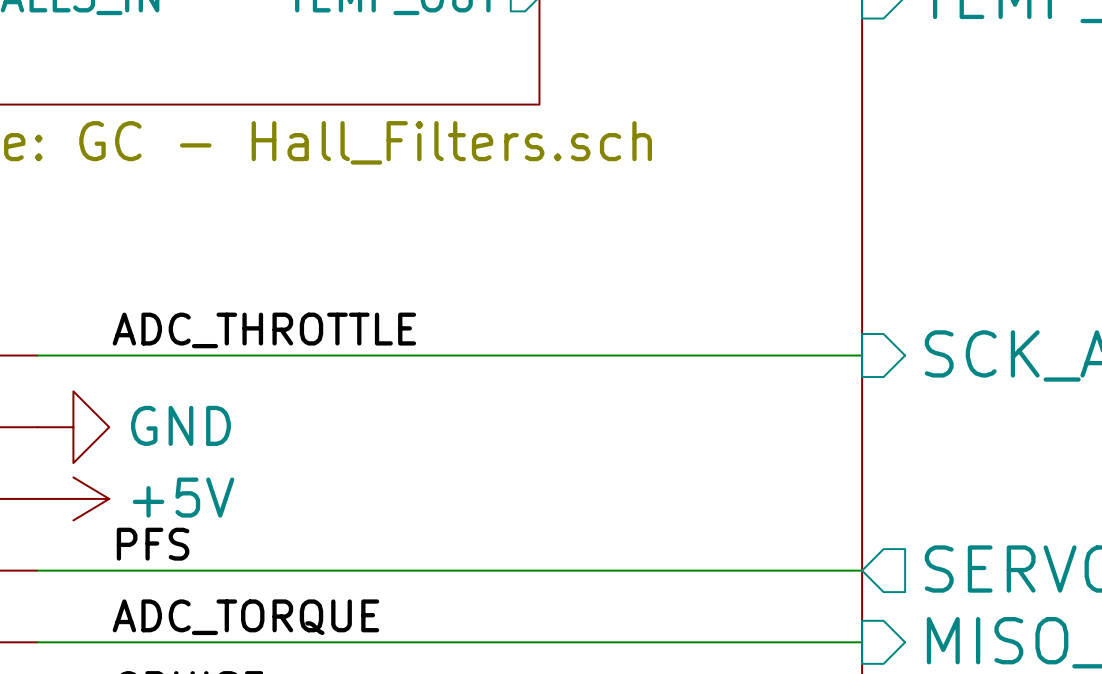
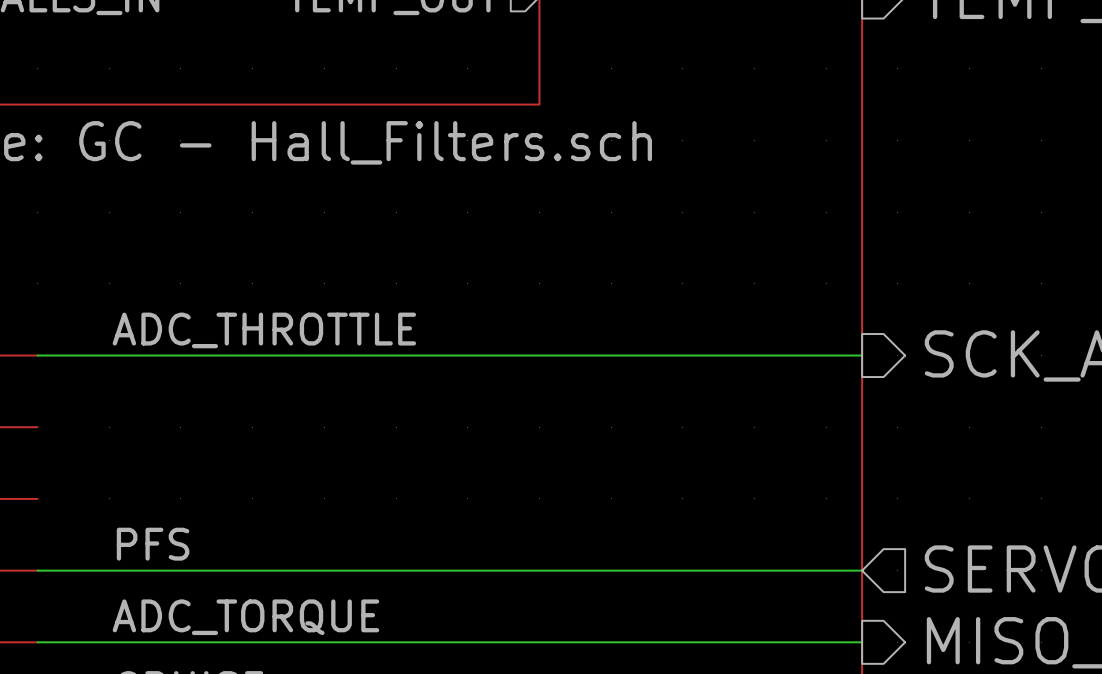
power symbol: GND (73, 427) -> none
power symbol: +5V (73, 498) -> none

